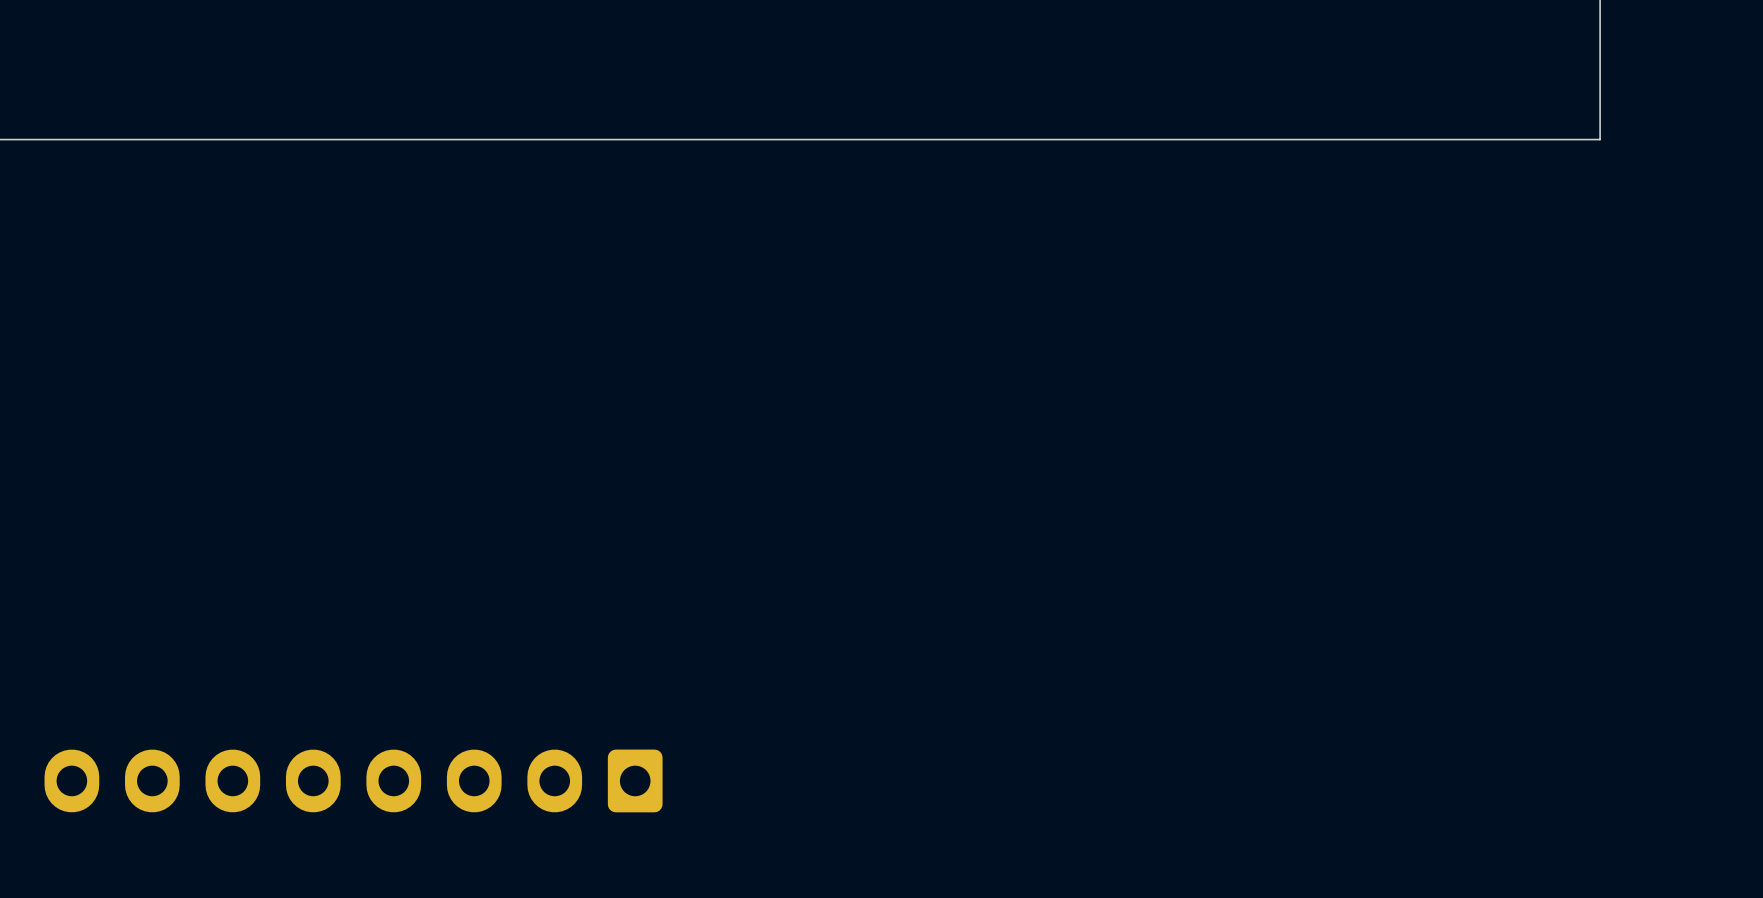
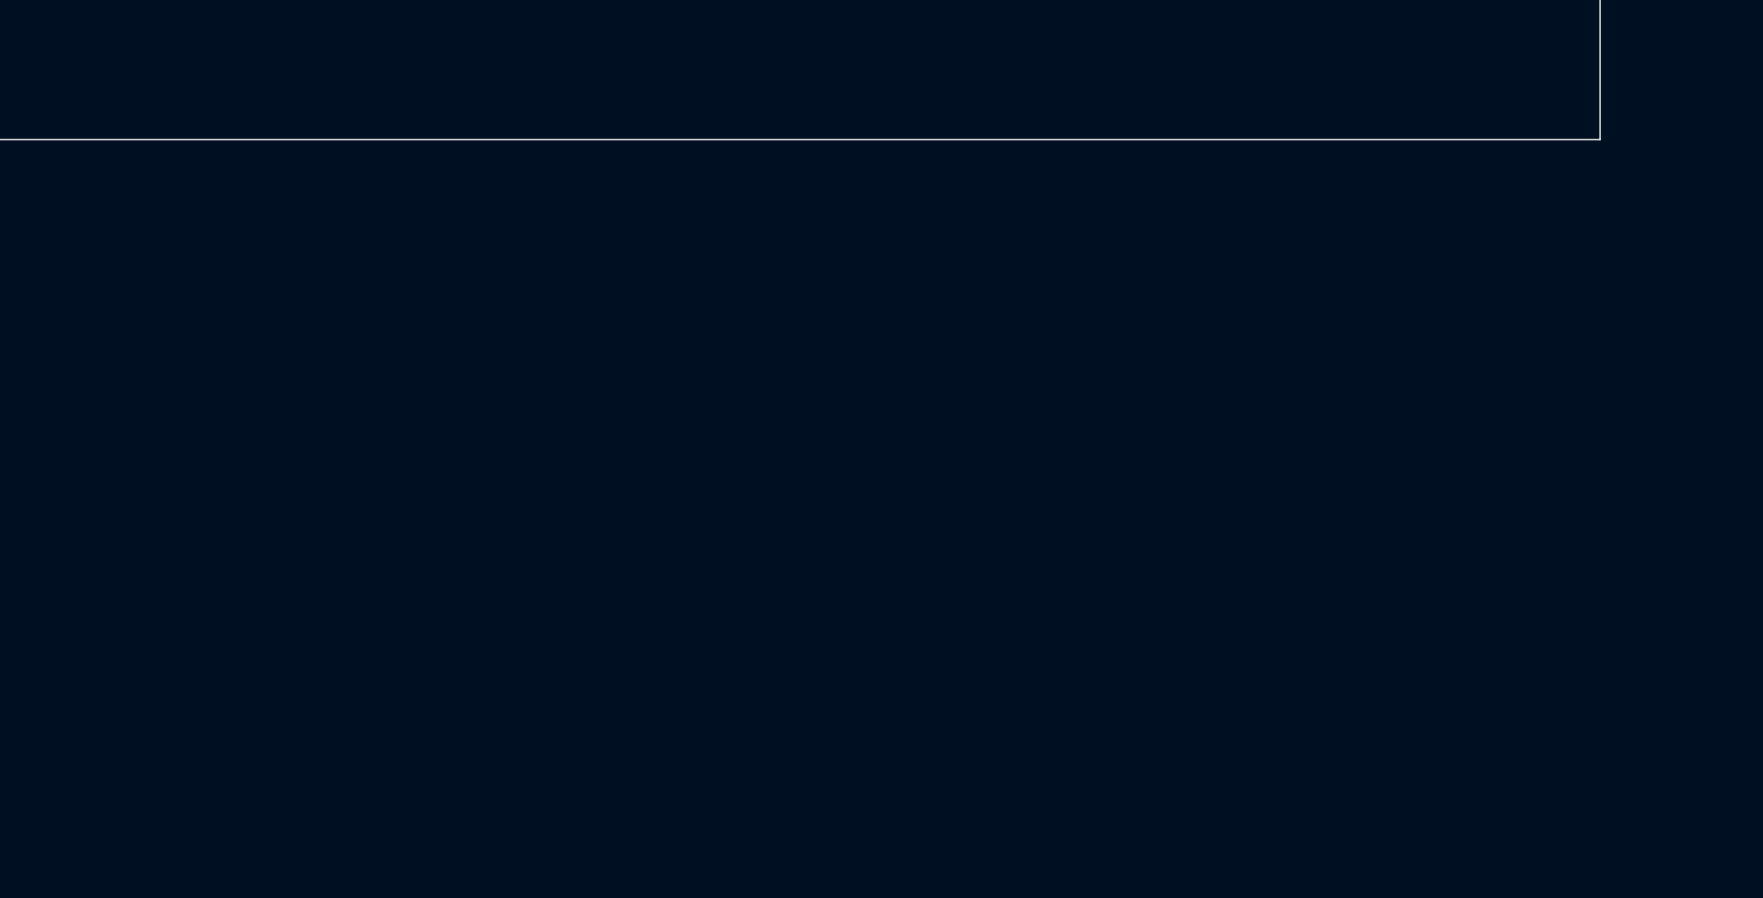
part: (353, 780) -> none

